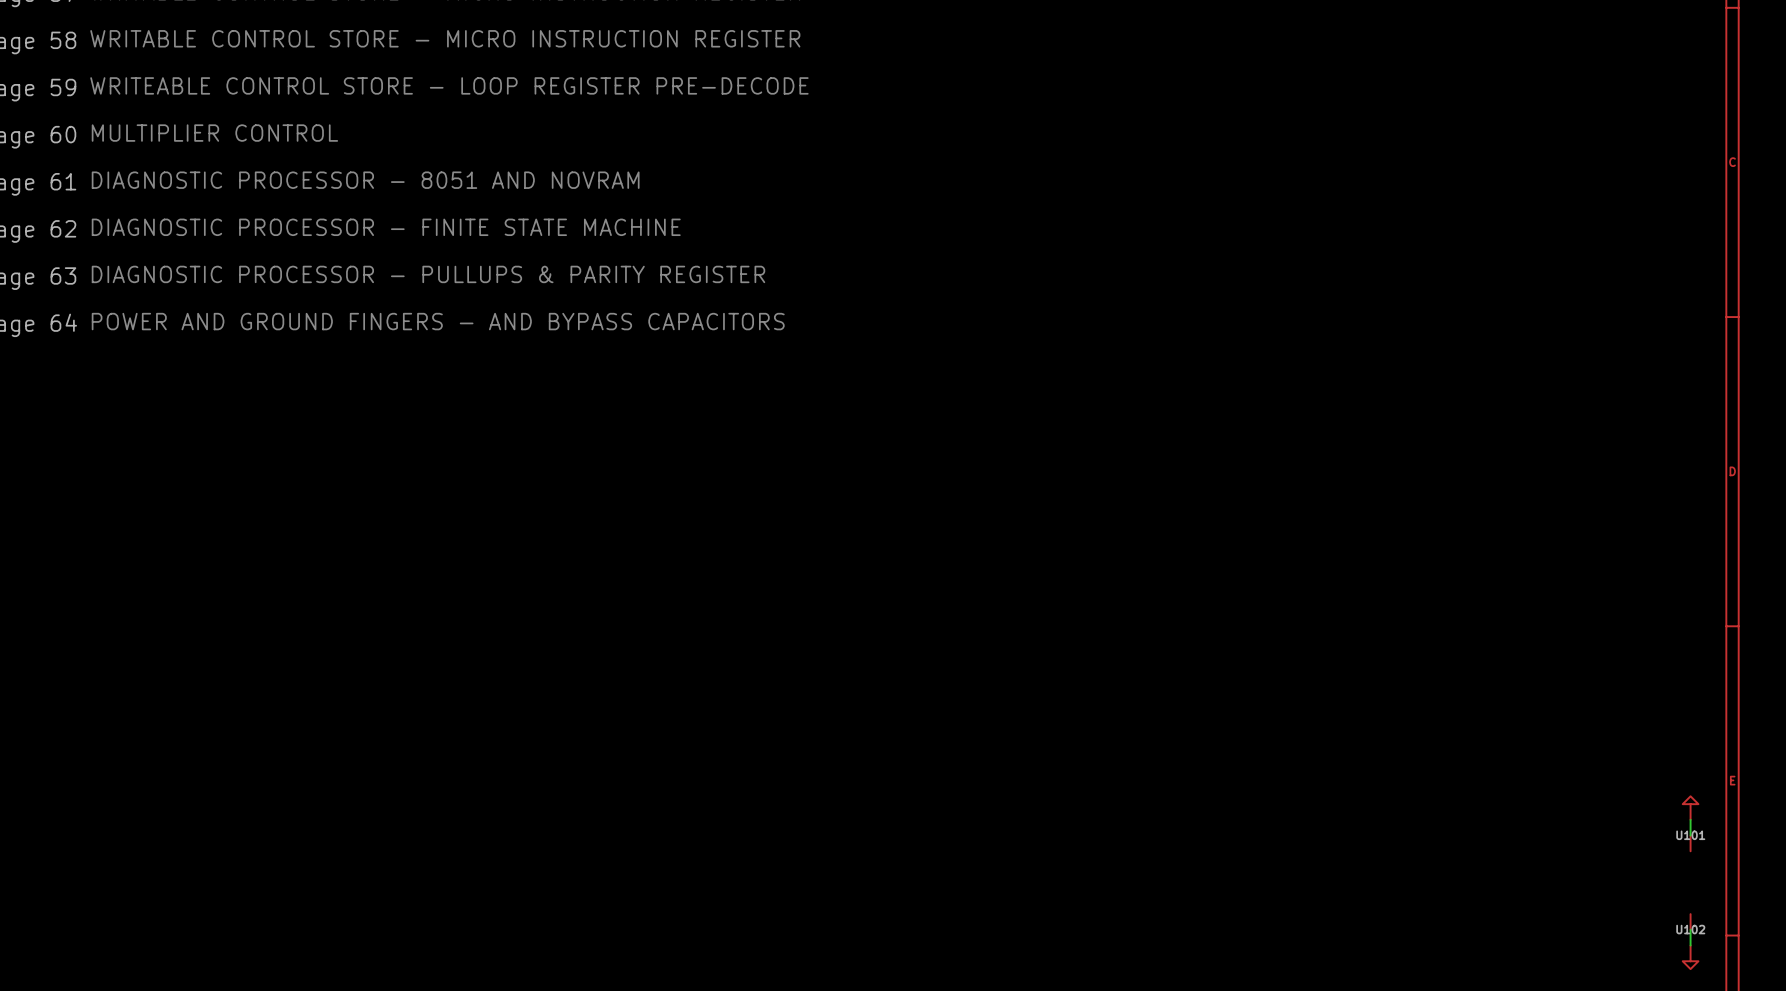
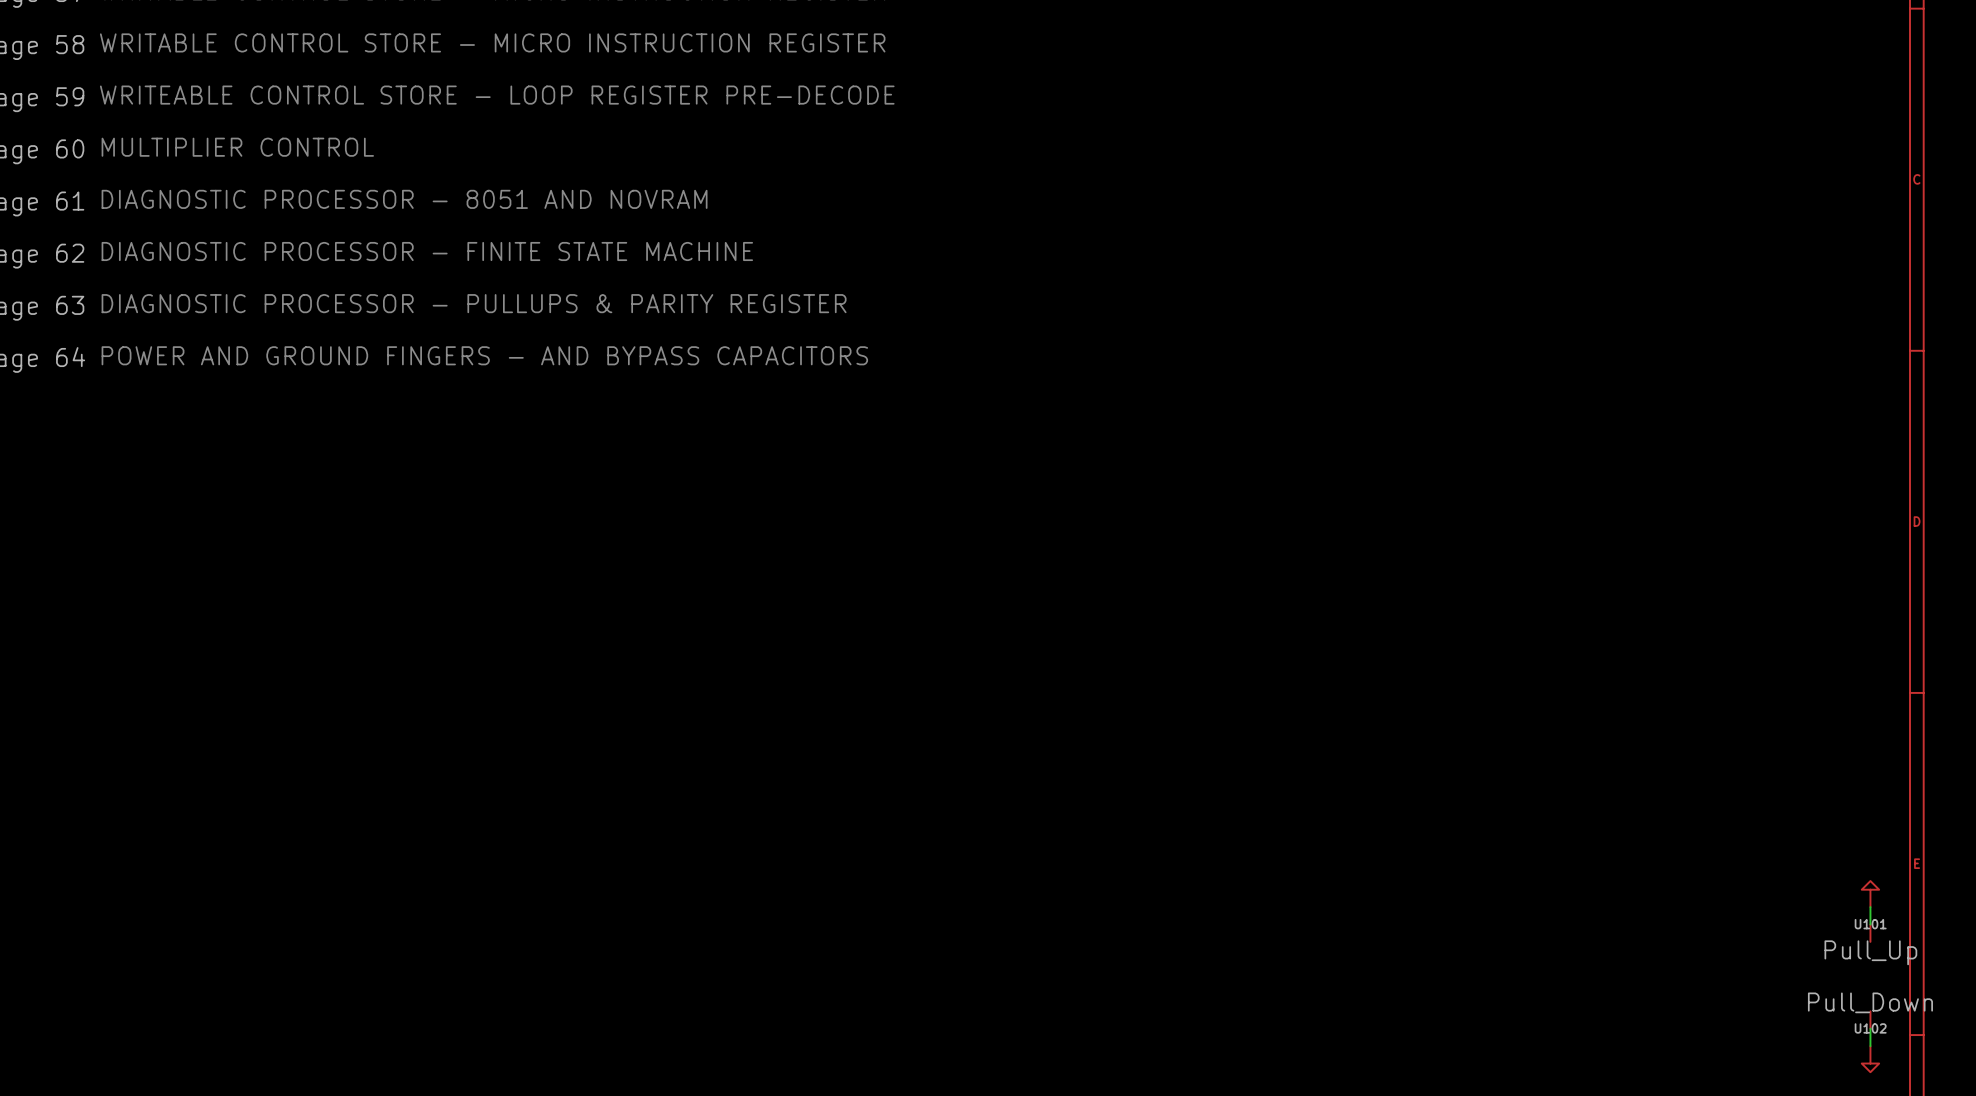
U101 value: none -> Pull_Up (1870, 952)
U102 value: none -> Pull_Down (1870, 1002)

